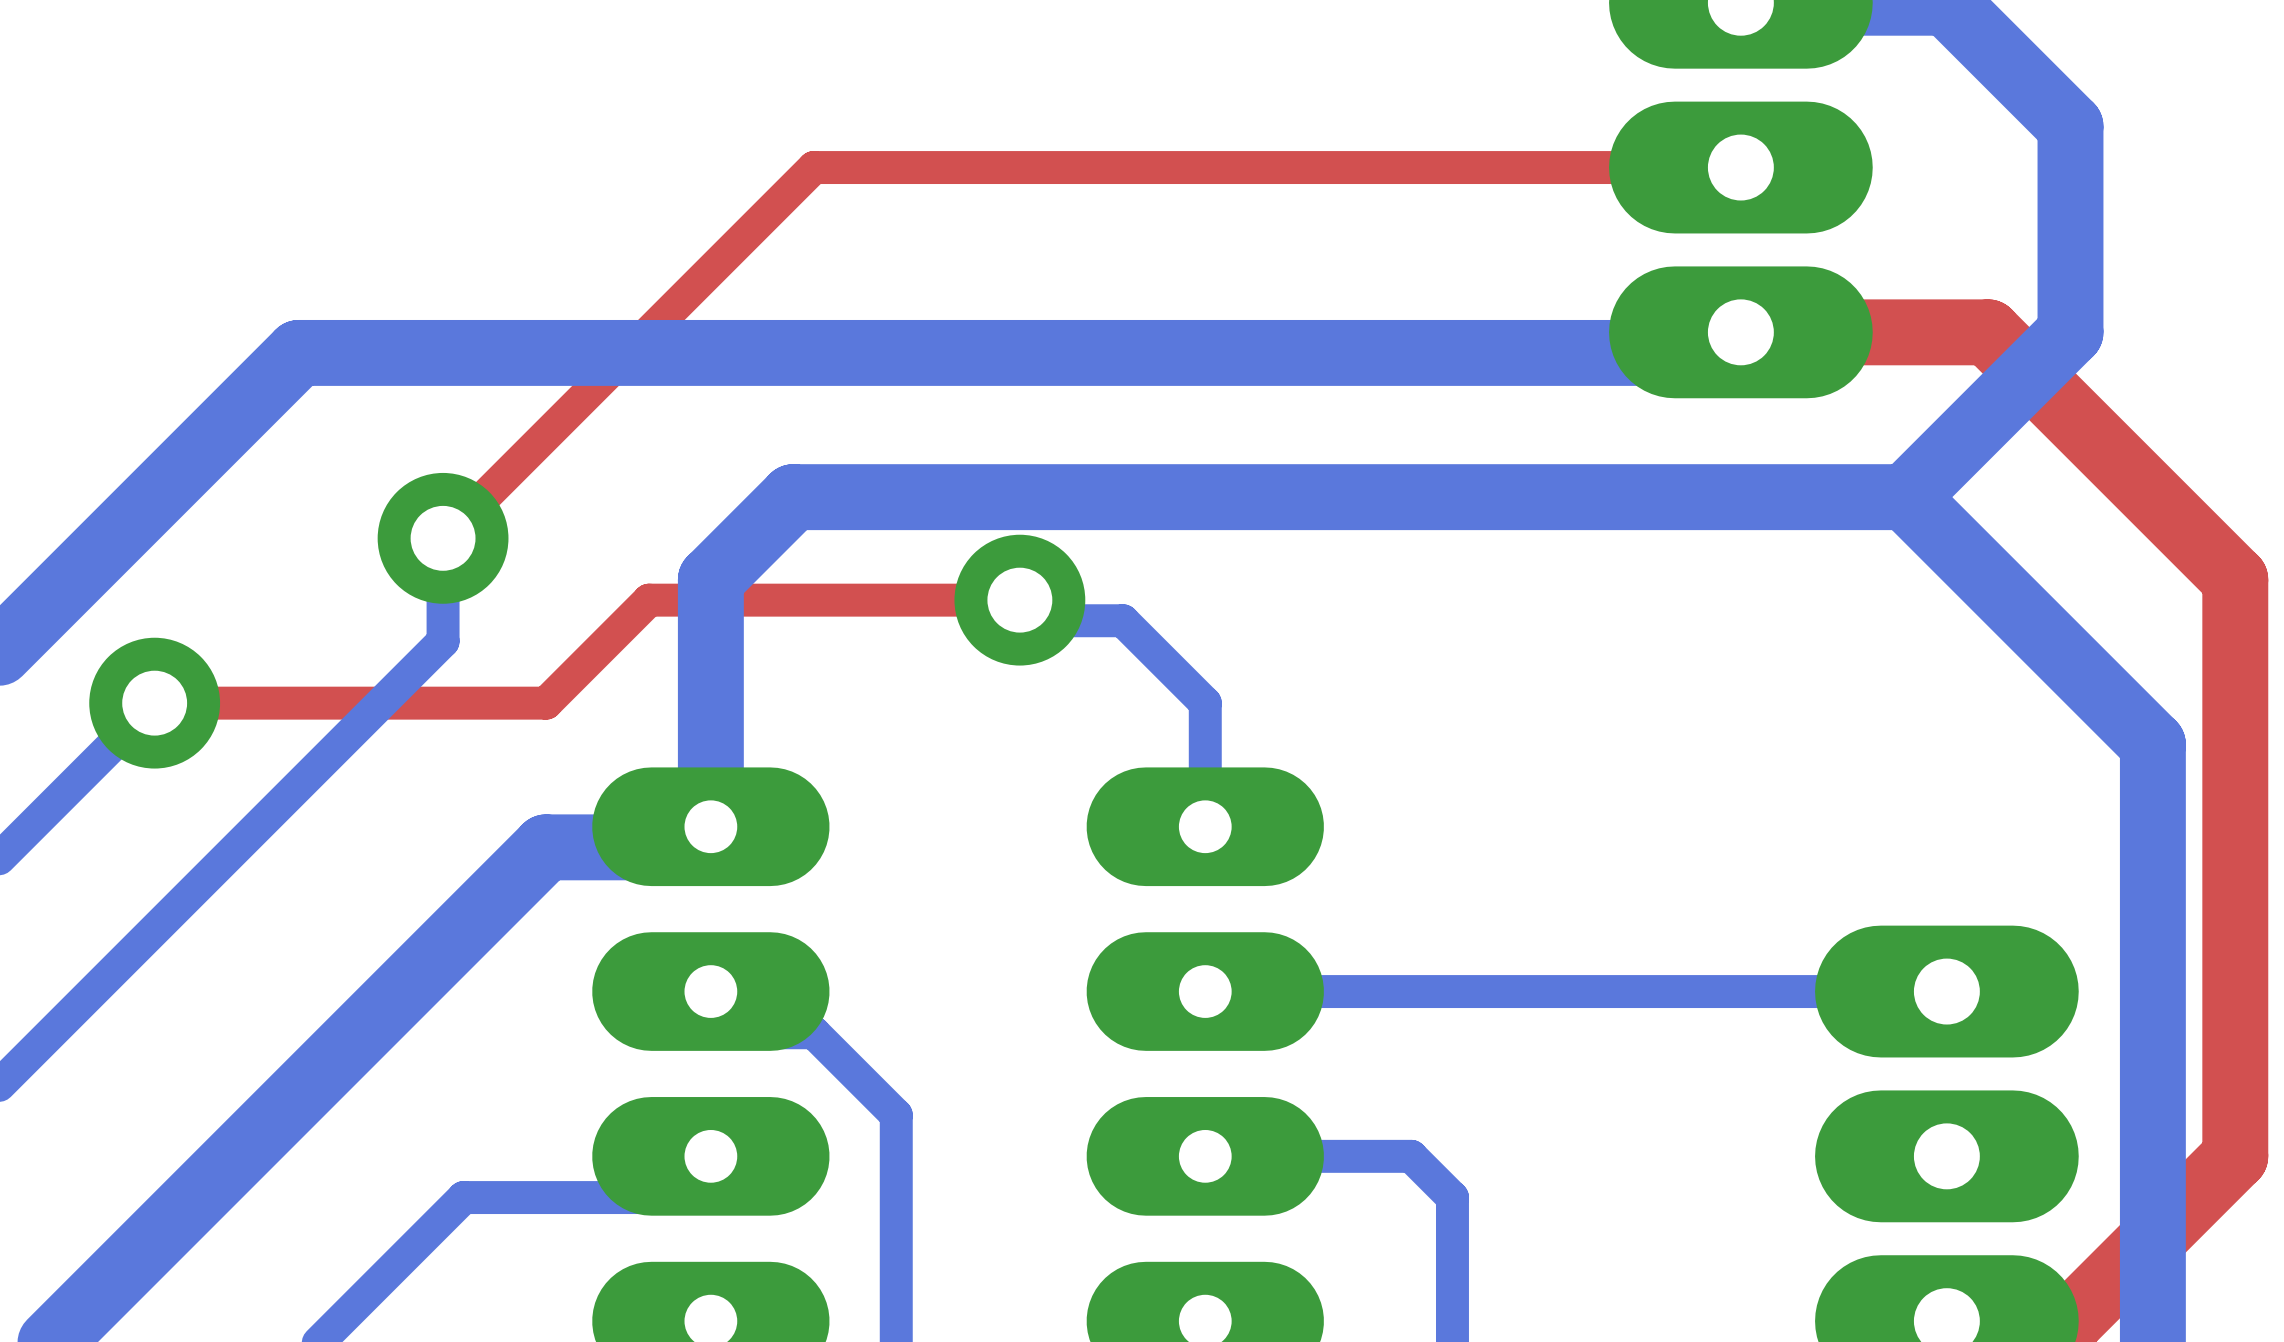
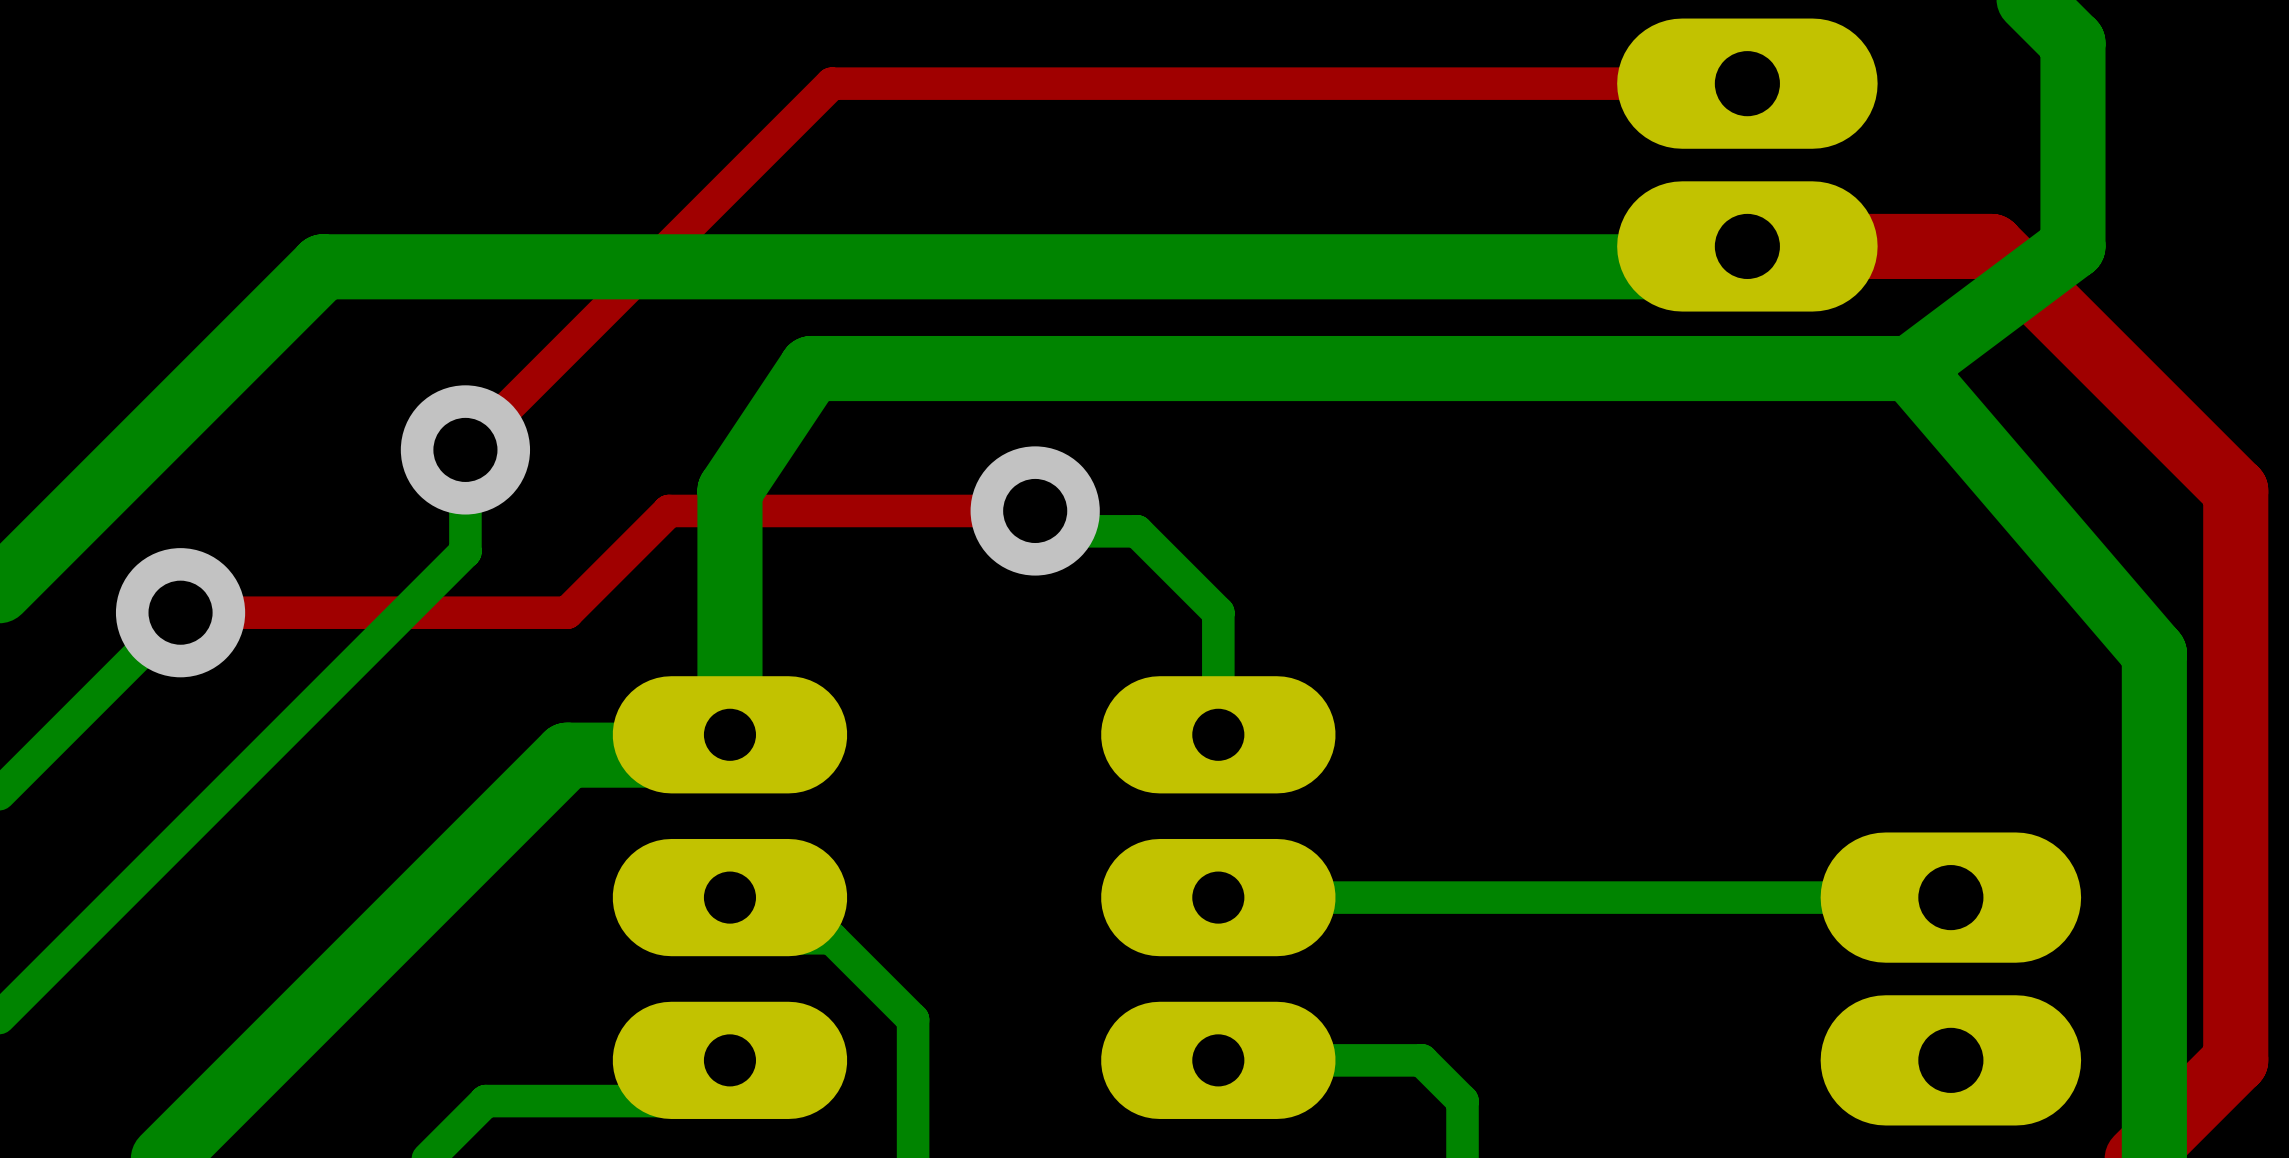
bottom track: (2070, 332) (1905, 497) -> (2072, 246) (1910, 368)
bottom track: (1905, 497) (793, 497) (710, 579) -> (1910, 368) (811, 368) (729, 490)
bottom track: (1905, 497) (2152, 744) -> (1910, 368) (2154, 653)

